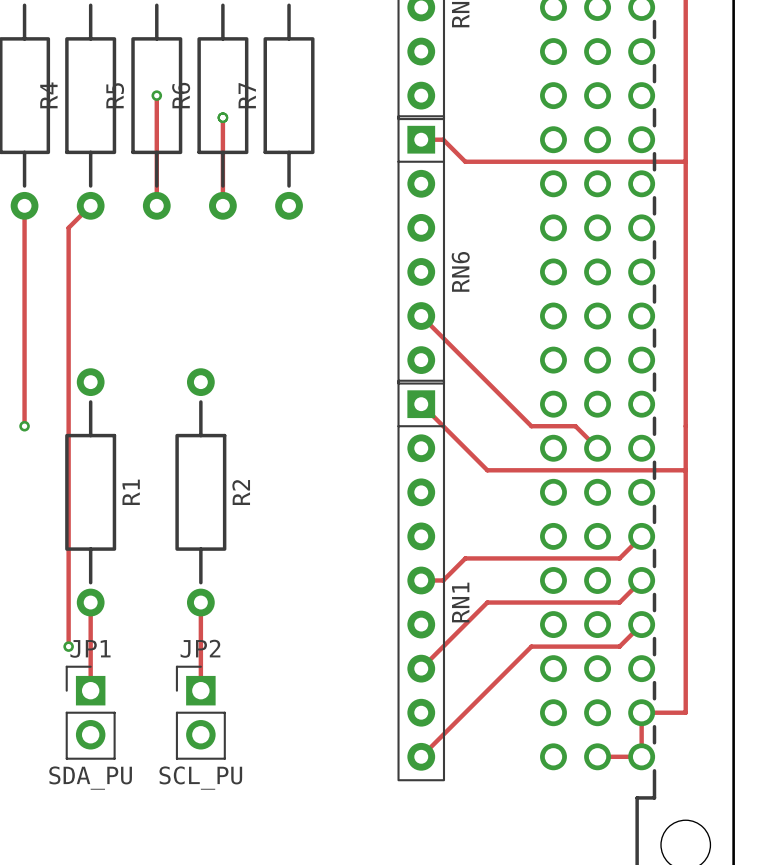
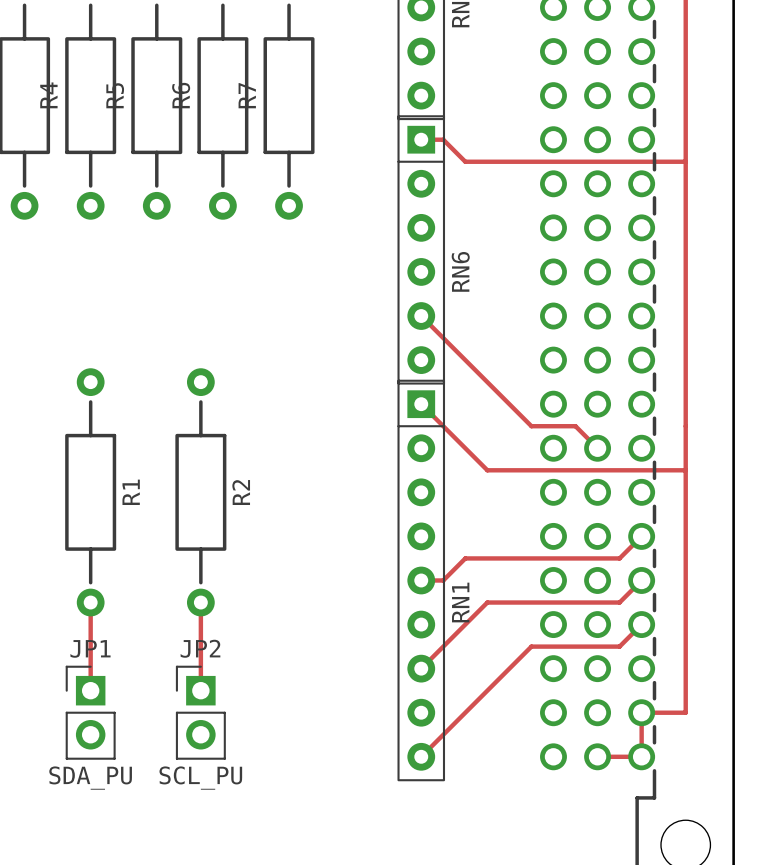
track: (156, 95) (156, 205) -> none
via: (156, 95) -> none
track: (222, 117) (222, 205) -> none
via: (222, 117) -> none
track: (24, 205) (24, 426) -> none
track: (90, 205) (68, 227) (68, 646) -> none
via: (24, 426) -> none
via: (68, 646) -> none

